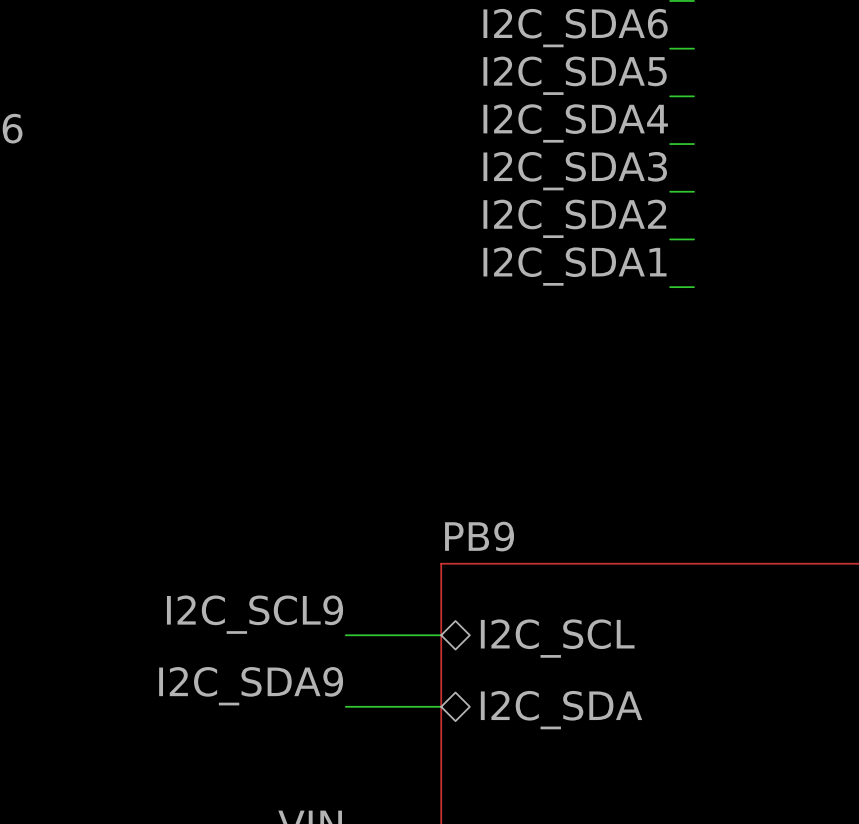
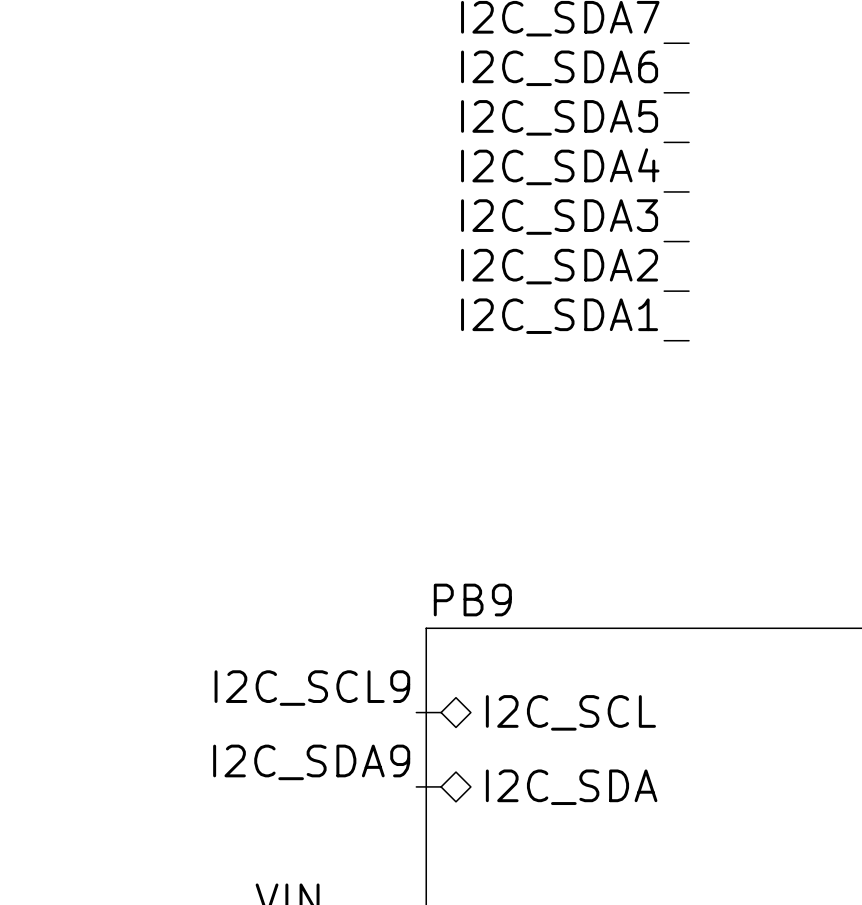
label position: I2C_SCL9 (255, 614) -> I2C_SCL9 (312, 688)
wire: (345, 635) (441, 635) -> none
sheet pin position: I2C_SCL (557, 638) -> I2C_SCL (570, 712)
wire: none -> (416, 712) (441, 712)
label position: I2C_SDA9 (251, 686) -> I2C_SDA9 (311, 762)
wire: (345, 706) (441, 706) -> none
sheet pin position: I2C_SDA (561, 710) -> I2C_SDA (571, 787)
wire: none -> (416, 786) (441, 786)

